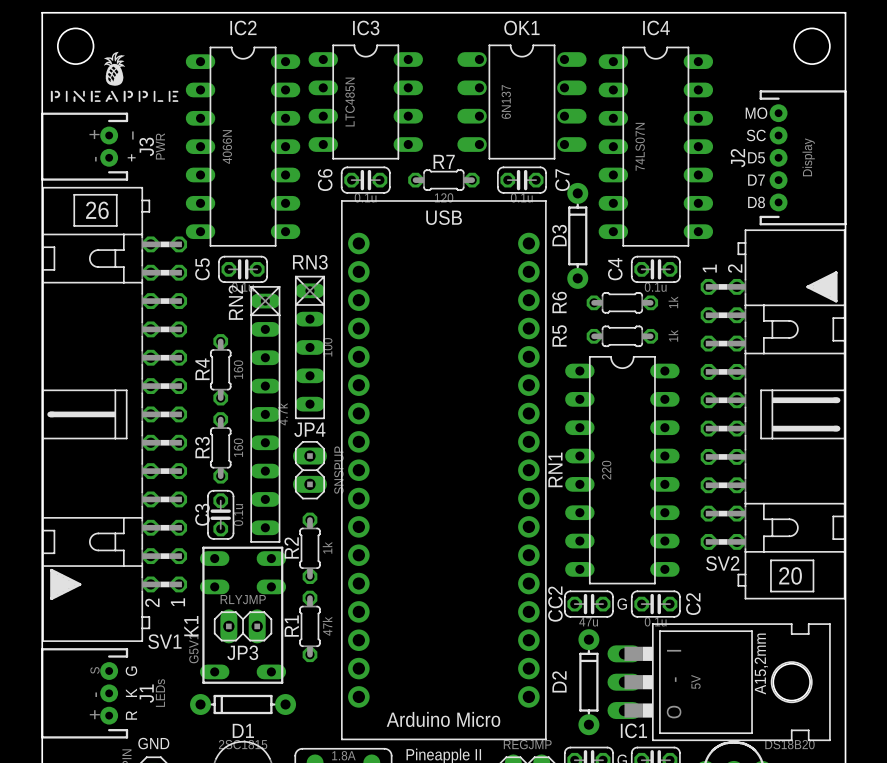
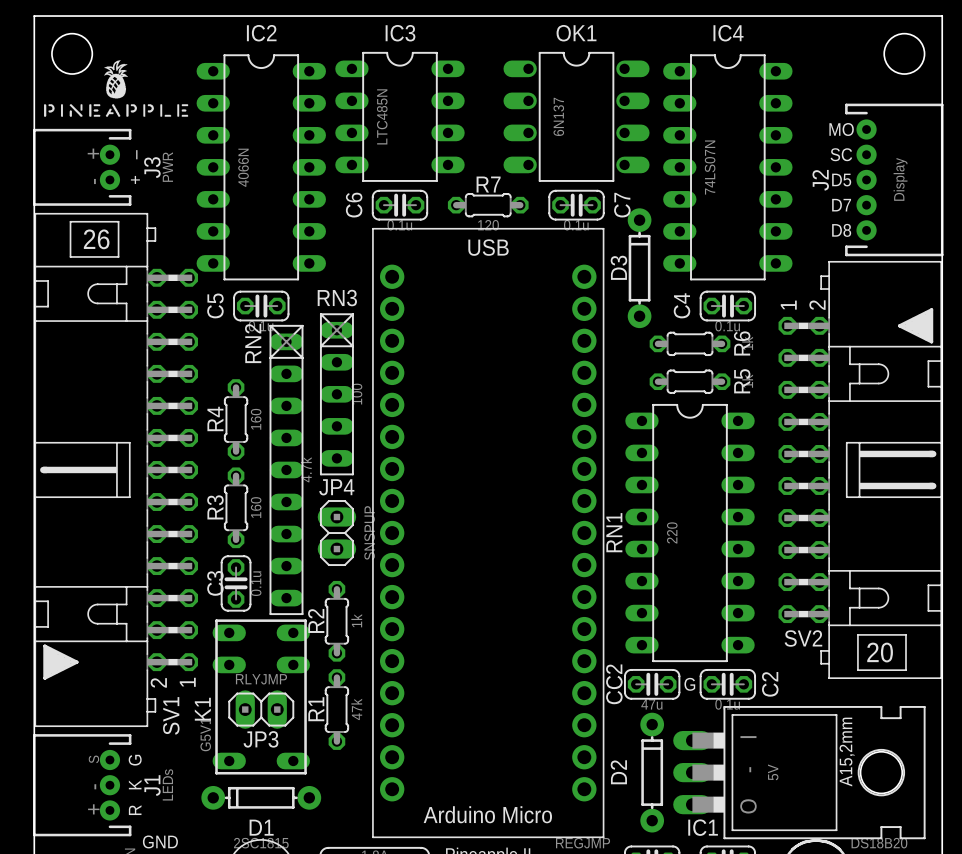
R6 name position: R6 (559, 302) -> R6 (742, 343)
R5 name position: R5 (559, 335) -> R5 (742, 381)
SV1 name rotation: 0° (164, 641) -> 90° counterclockwise (171, 715)

